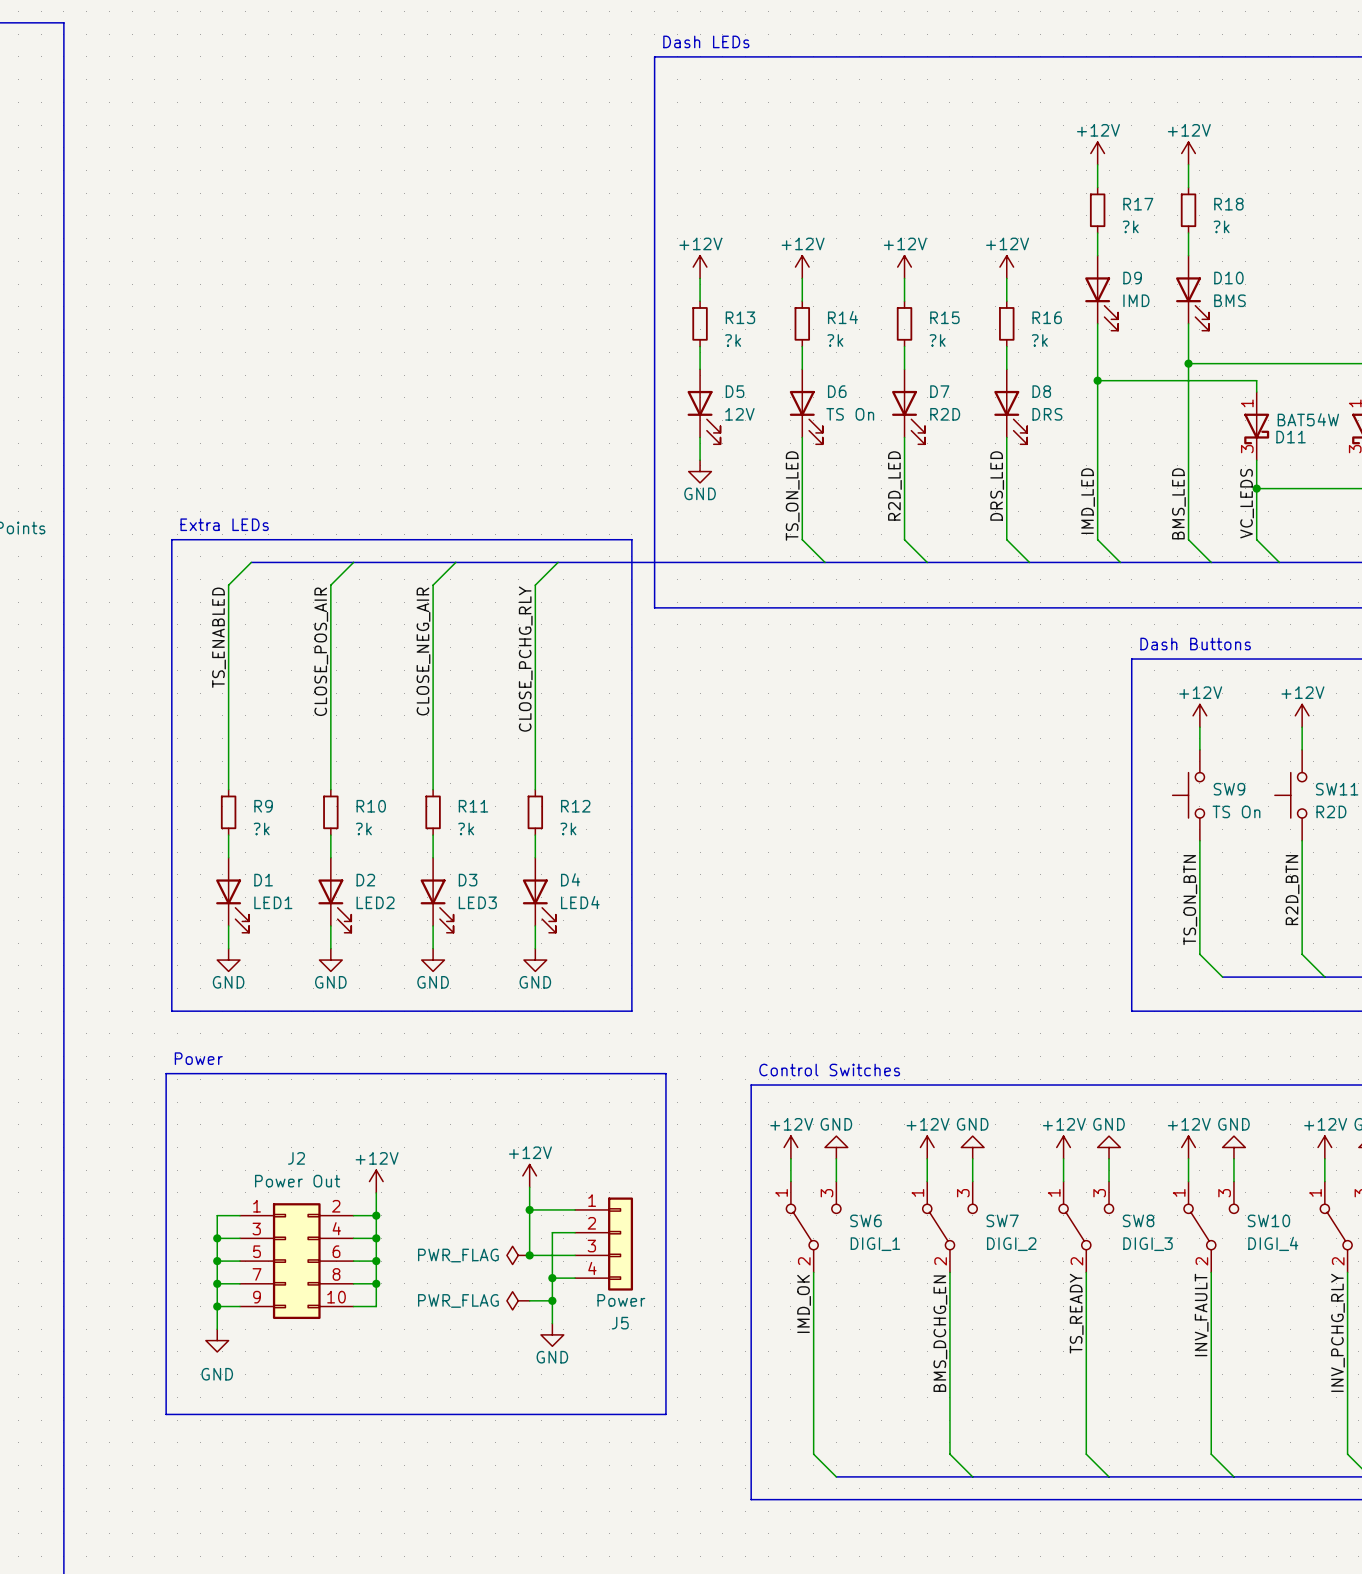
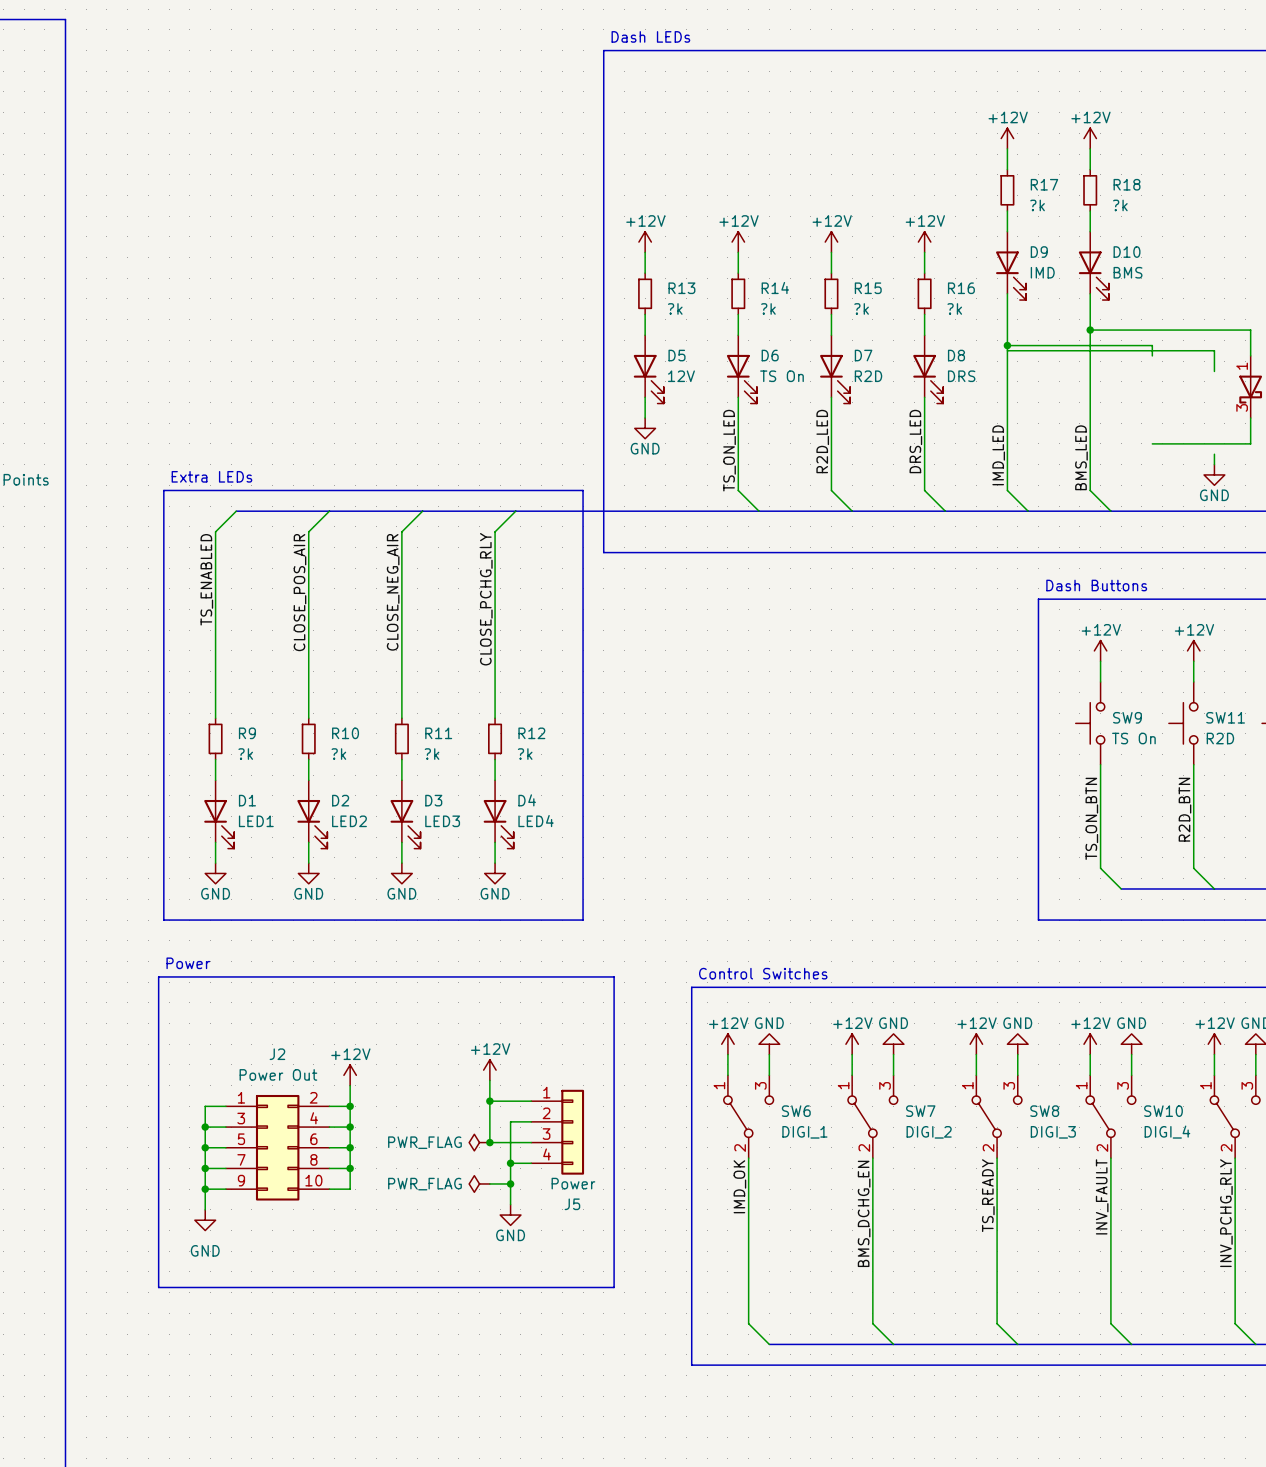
wire: none -> (1007, 350) (1214, 350) (1214, 371)
D11: BAT54W (1256, 426) -> none
wire: (1256, 460) (1256, 539) -> none
junction: (1256, 488) -> none
wire: none -> (1214, 454) (1214, 464)
label: VC_LEDS (1247, 503) -> none
power symbol: none -> GND (1214, 474)
wire: (1256, 539) (1279, 562) -> none

